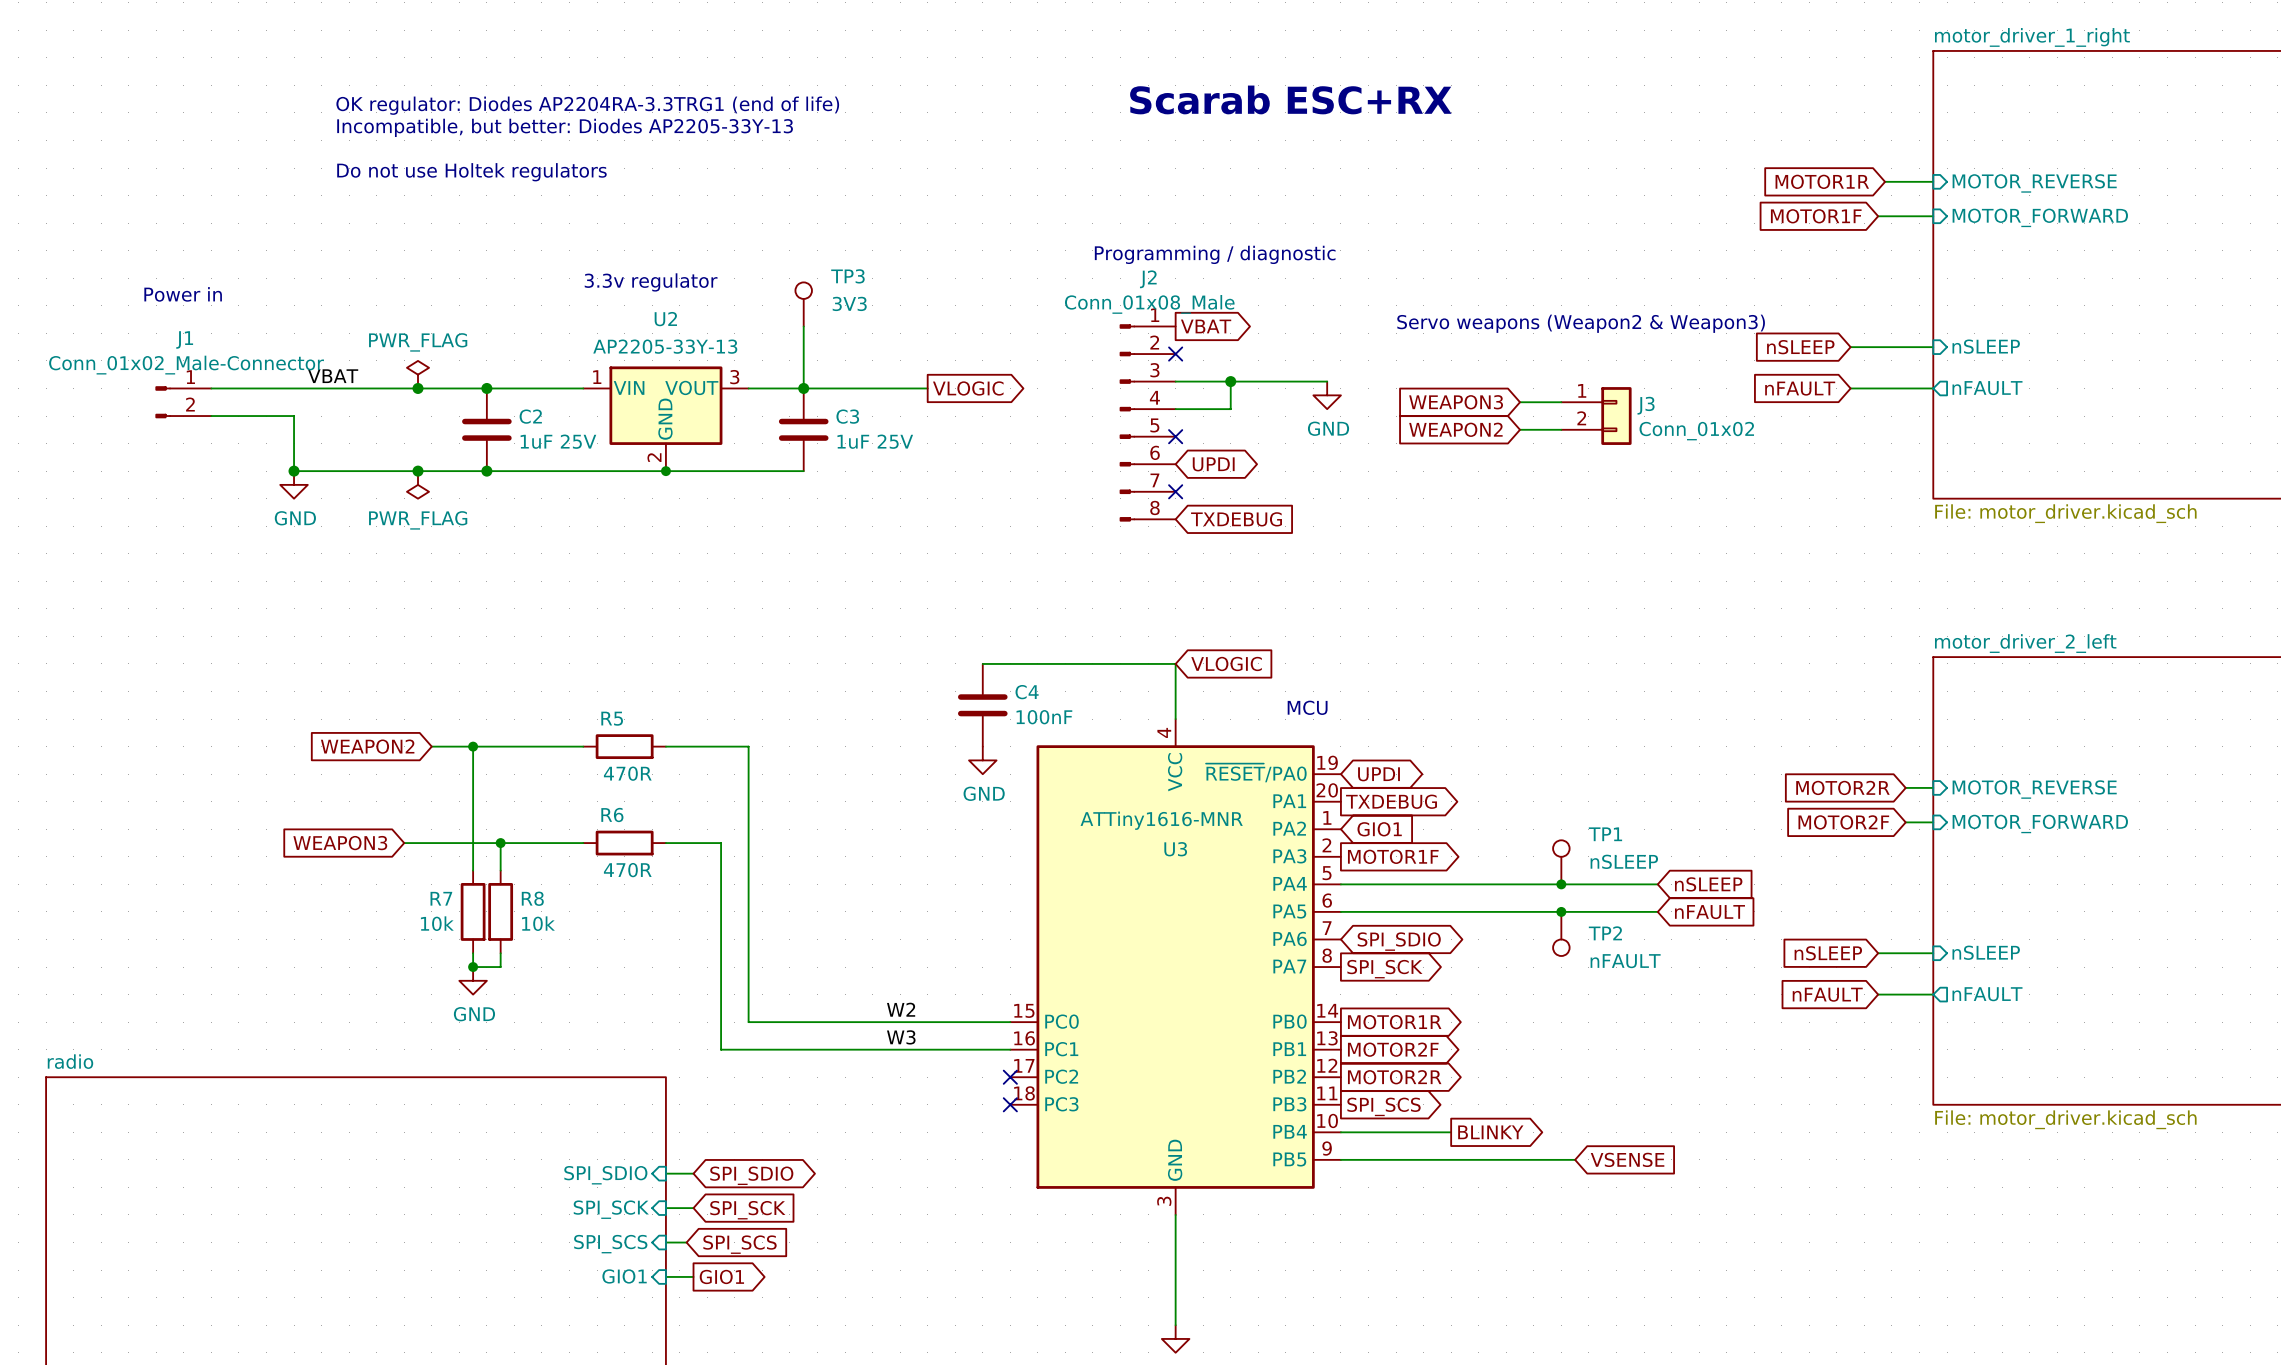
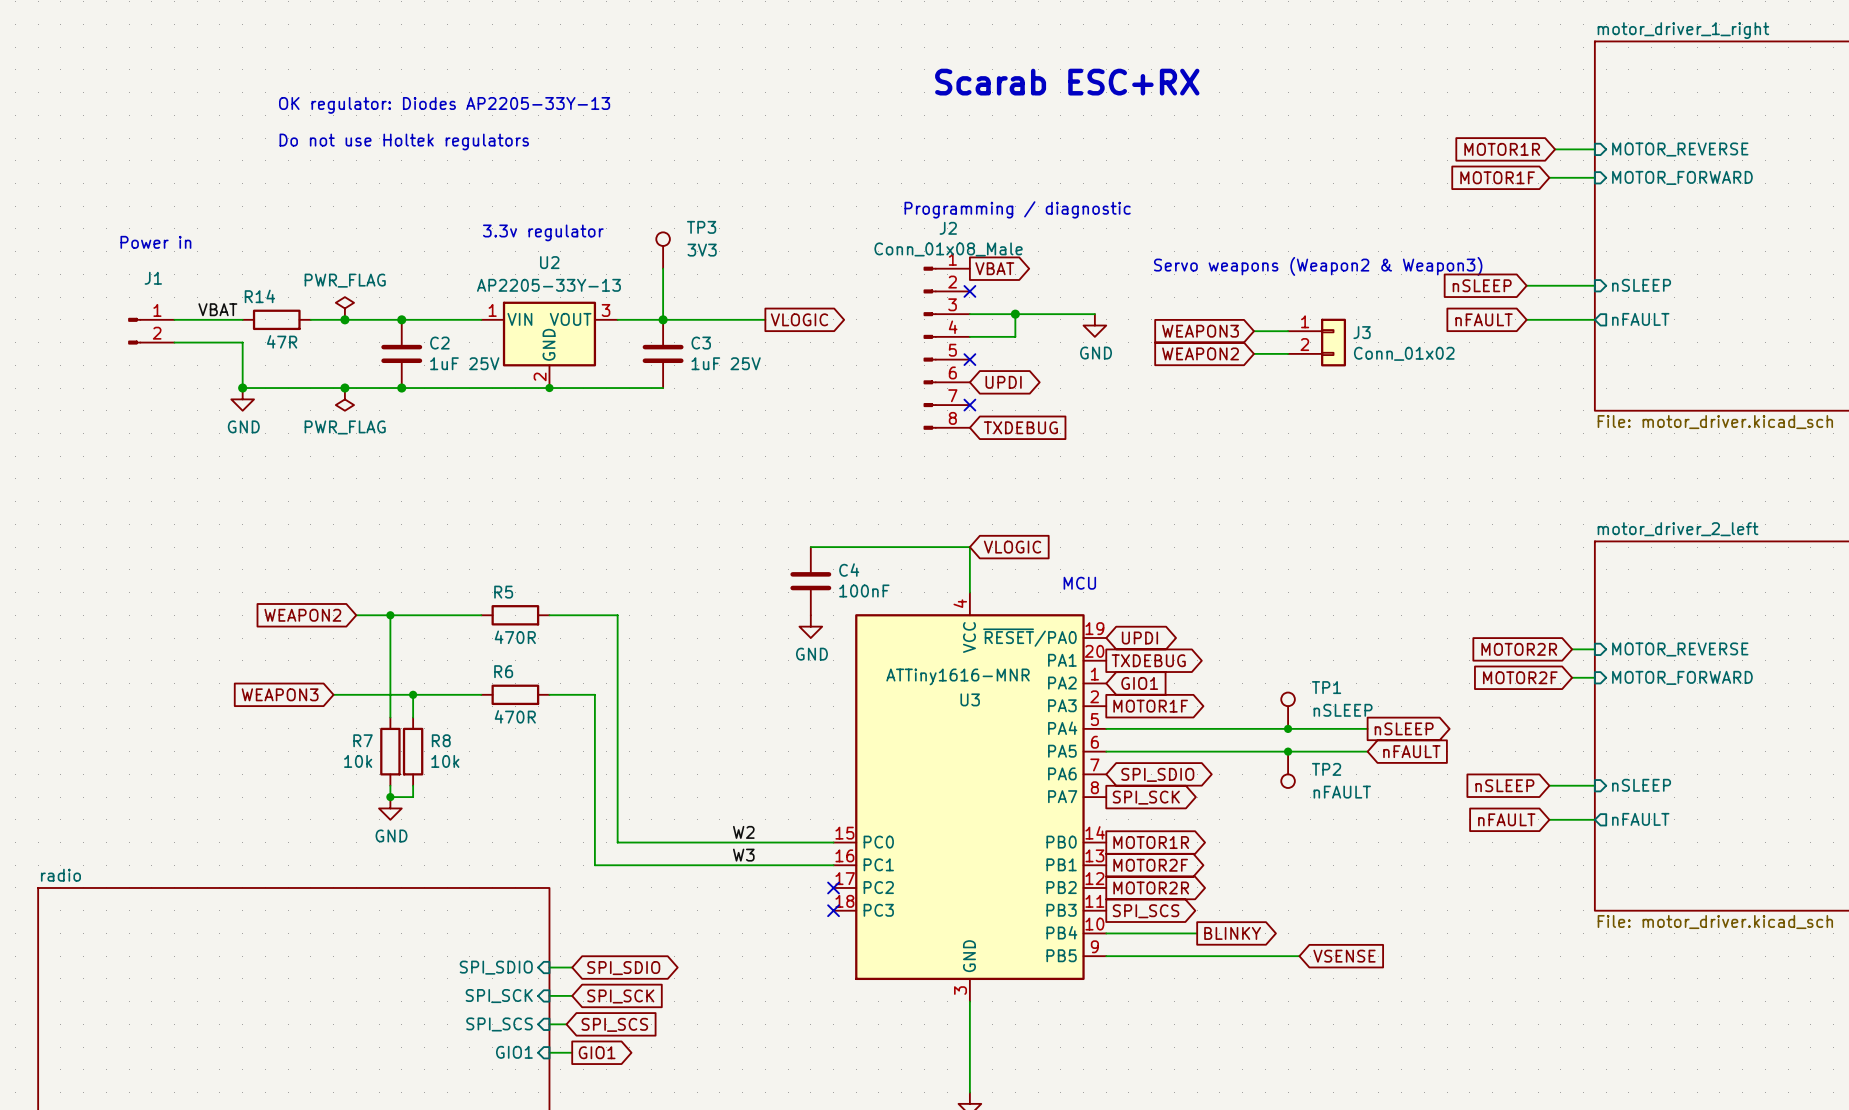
text: OK regulator: Diodes AP2204RA-3.3TRG1 (end of life) (587, 105) -> none
text: Incompatible, but better: Diodes AP2205-33Y-13 (565, 127) -> OK regulator: Diodes AP2205-33Y-13 (444, 105)
J1 value: Conn_01x02_Male-Connector (186, 365) -> none
label position: VBAT (333, 376) -> VBAT (217, 309)
wire: (294, 388) (376, 388) -> none
R14: none -> 47R (276, 319)
global label shape: input (1708, 884) -> output (1404, 728)

